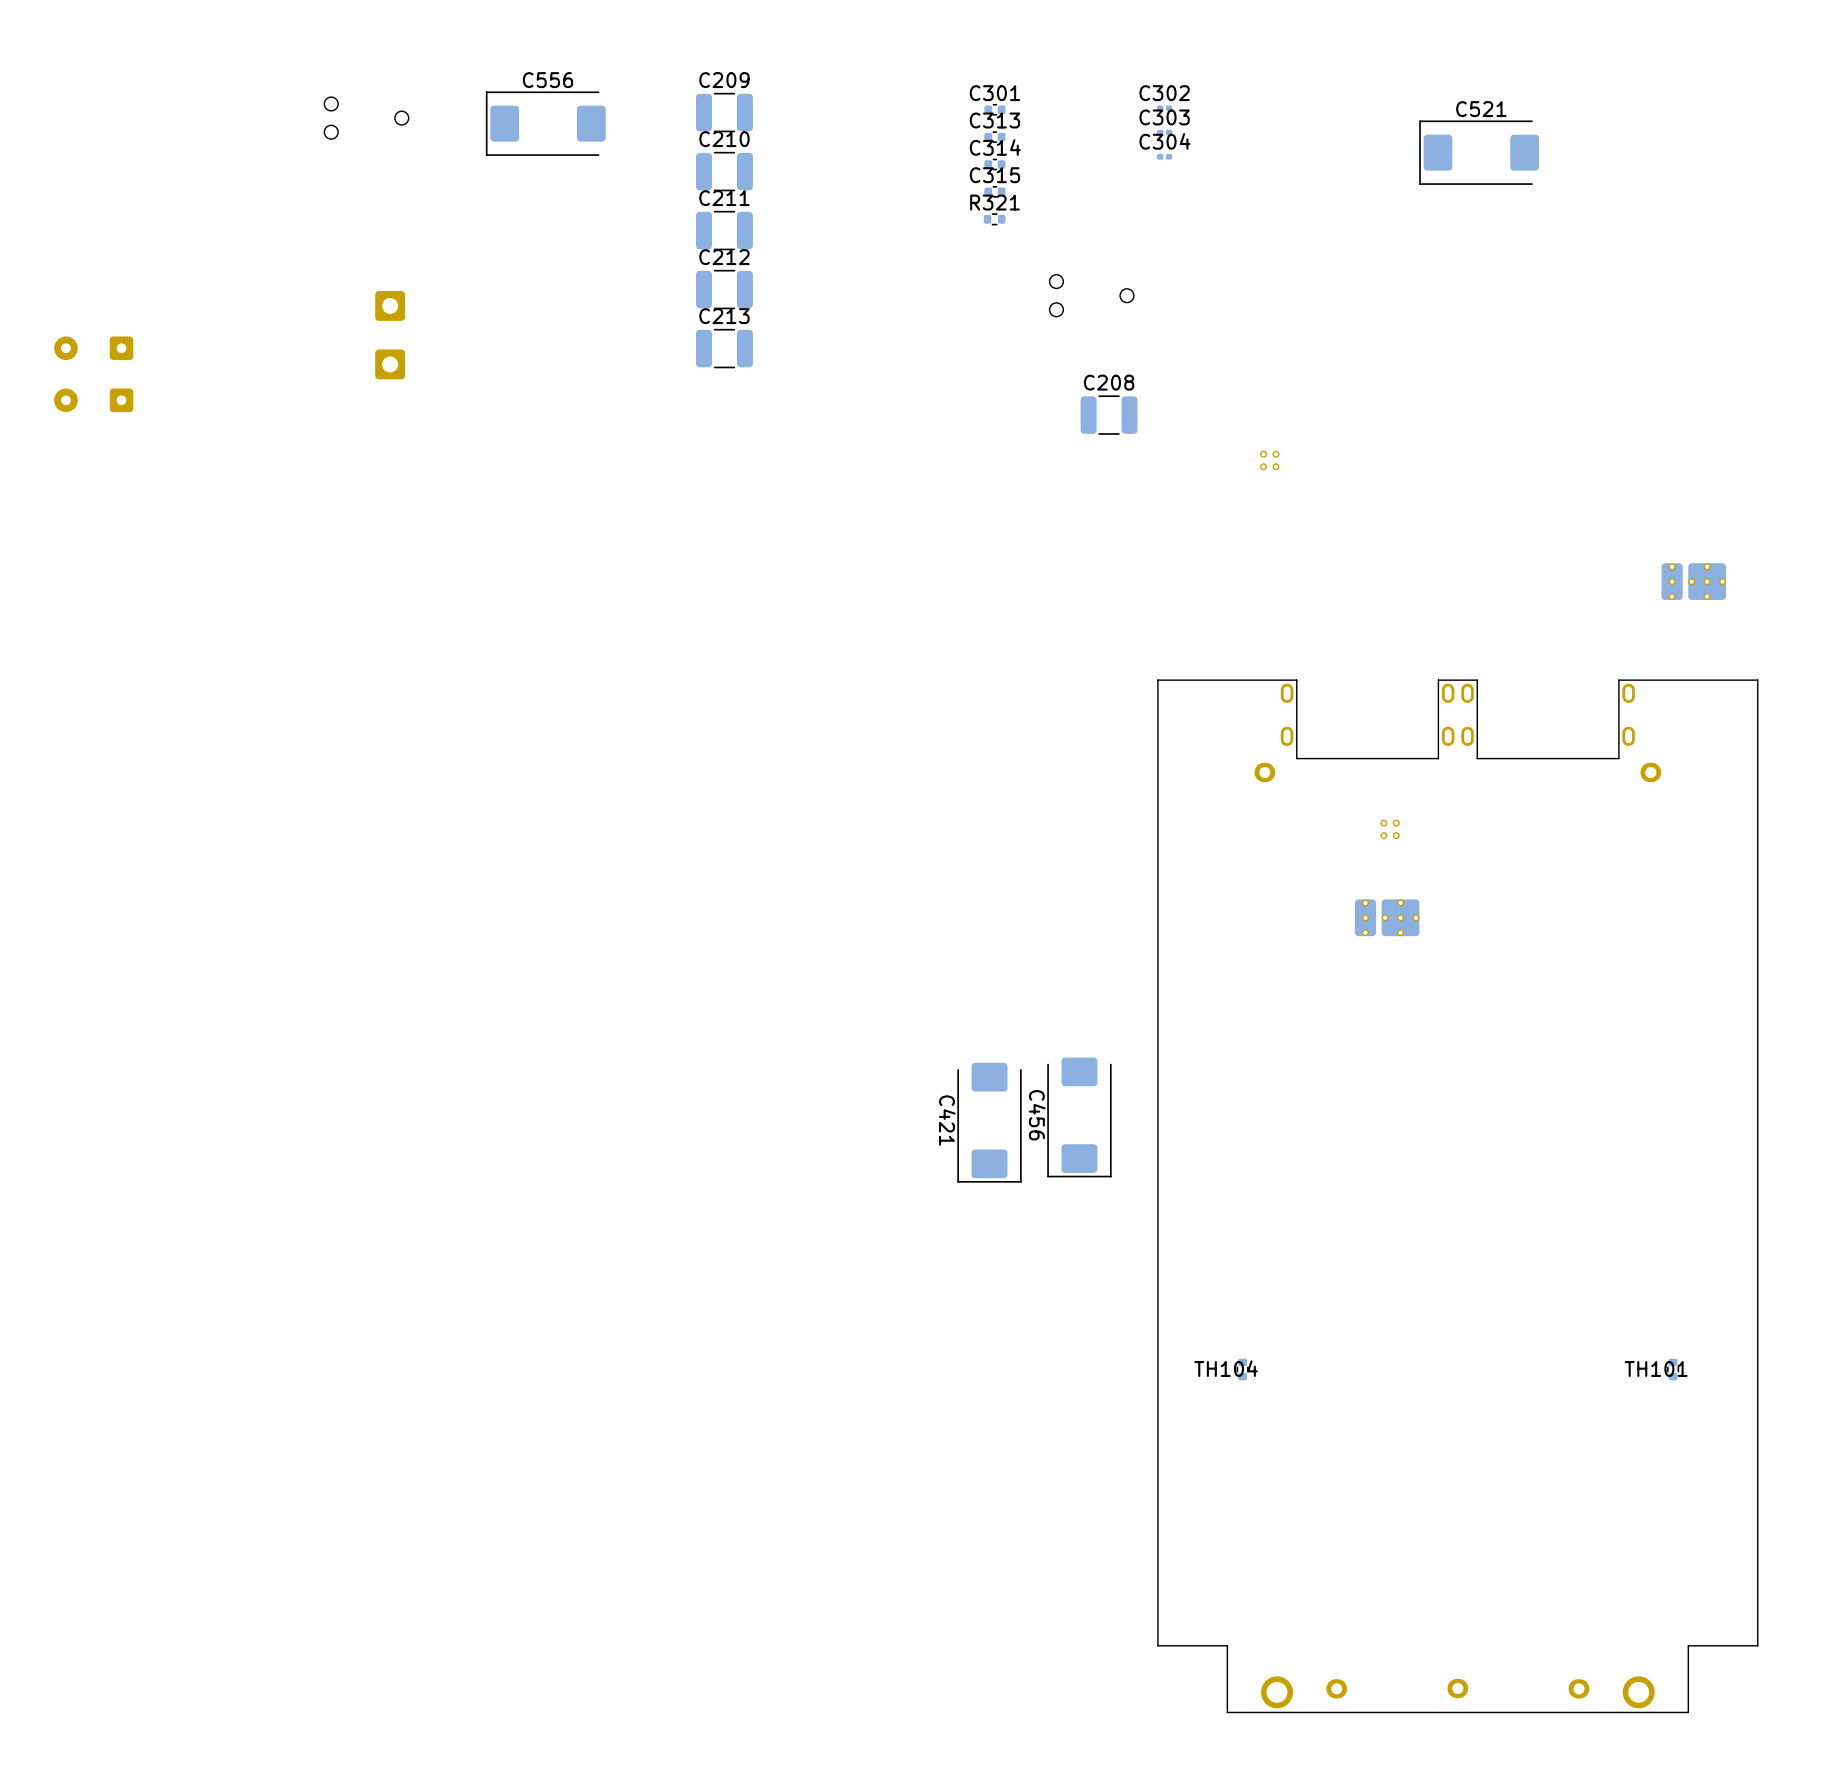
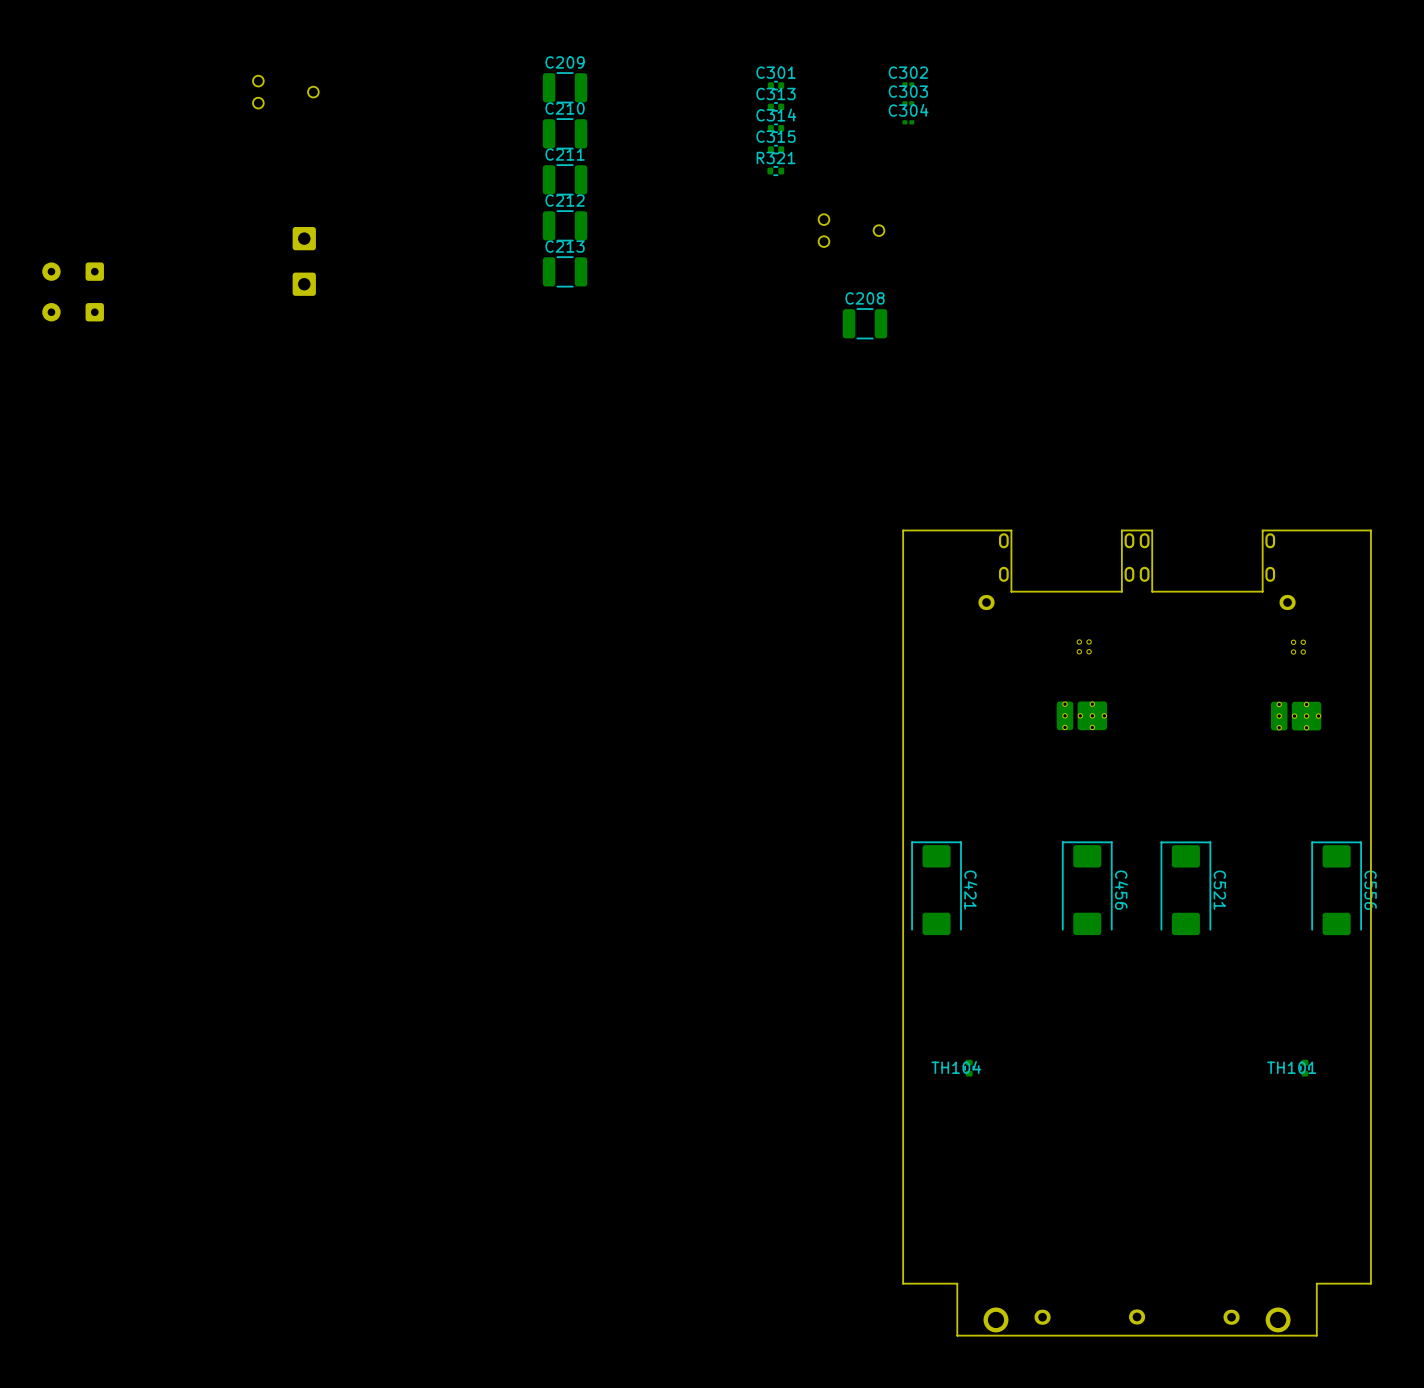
C556 rotation: 0° (545, 123) -> 90° clockwise (1336, 888)
C556 position: (545, 123) -> (1336, 888)
C521 rotation: 0° (1479, 152) -> 90° clockwise (1185, 888)
C521 position: (1479, 152) -> (1185, 888)
part: (1269, 460) -> none
part position: (1693, 581) -> (1296, 716)
part: none -> (1298, 647)
C456 rotation: 0° (1079, 1117) -> 180° (1087, 888)
C456 position: (1079, 1117) -> (1087, 888)
C421 rotation: 0° (989, 1122) -> 180° (936, 888)
C421 position: (989, 1122) -> (936, 888)

